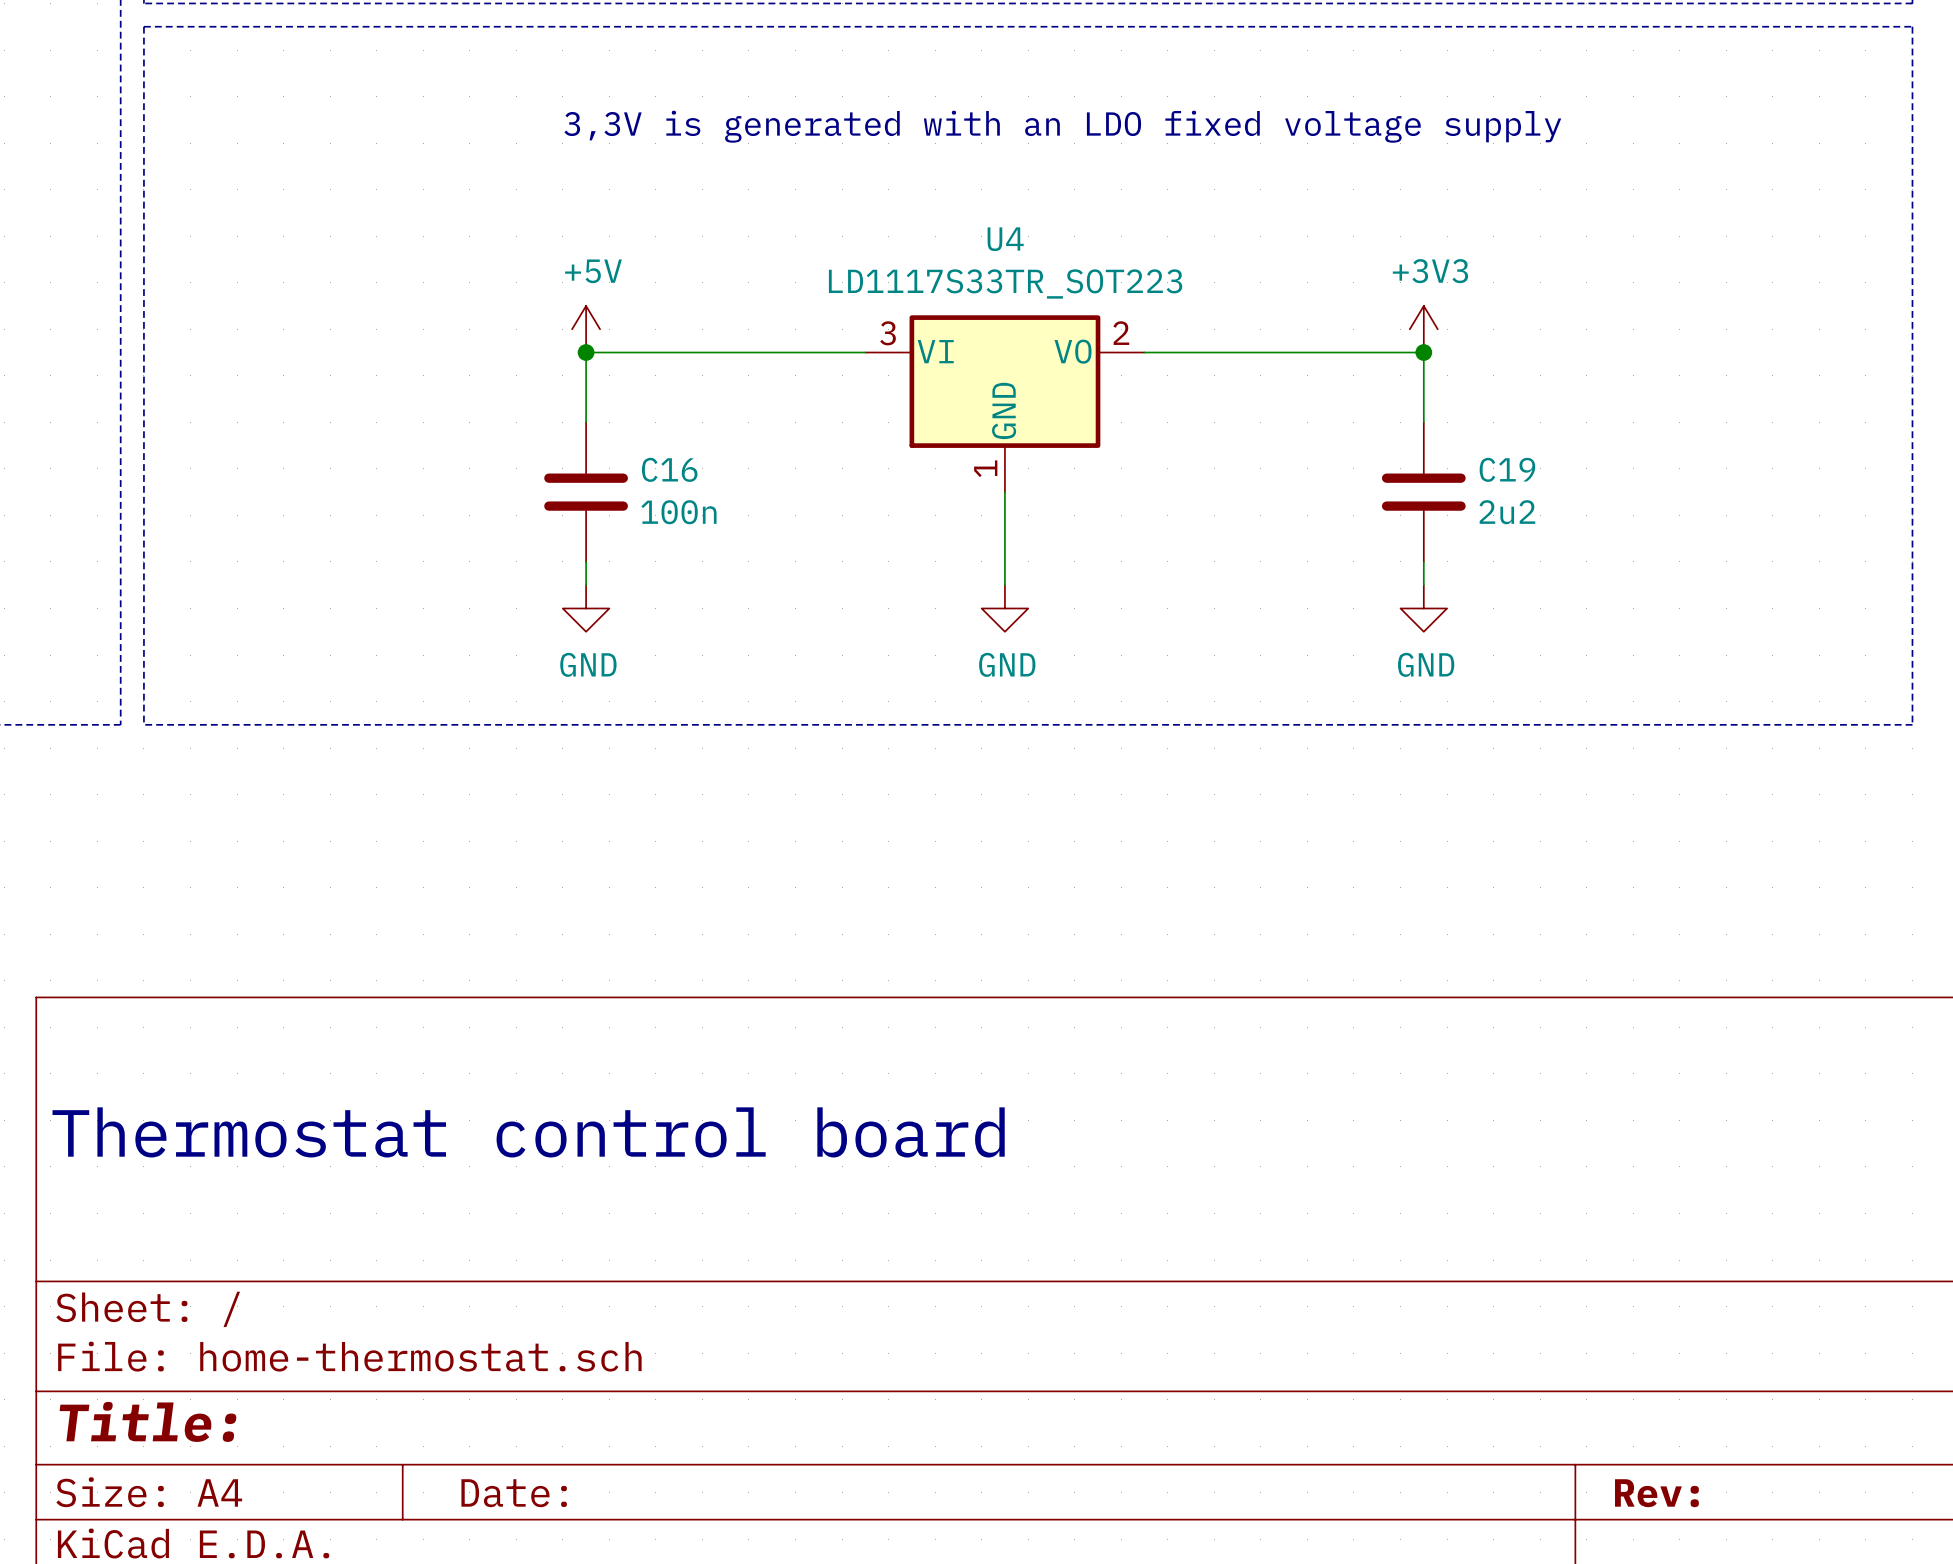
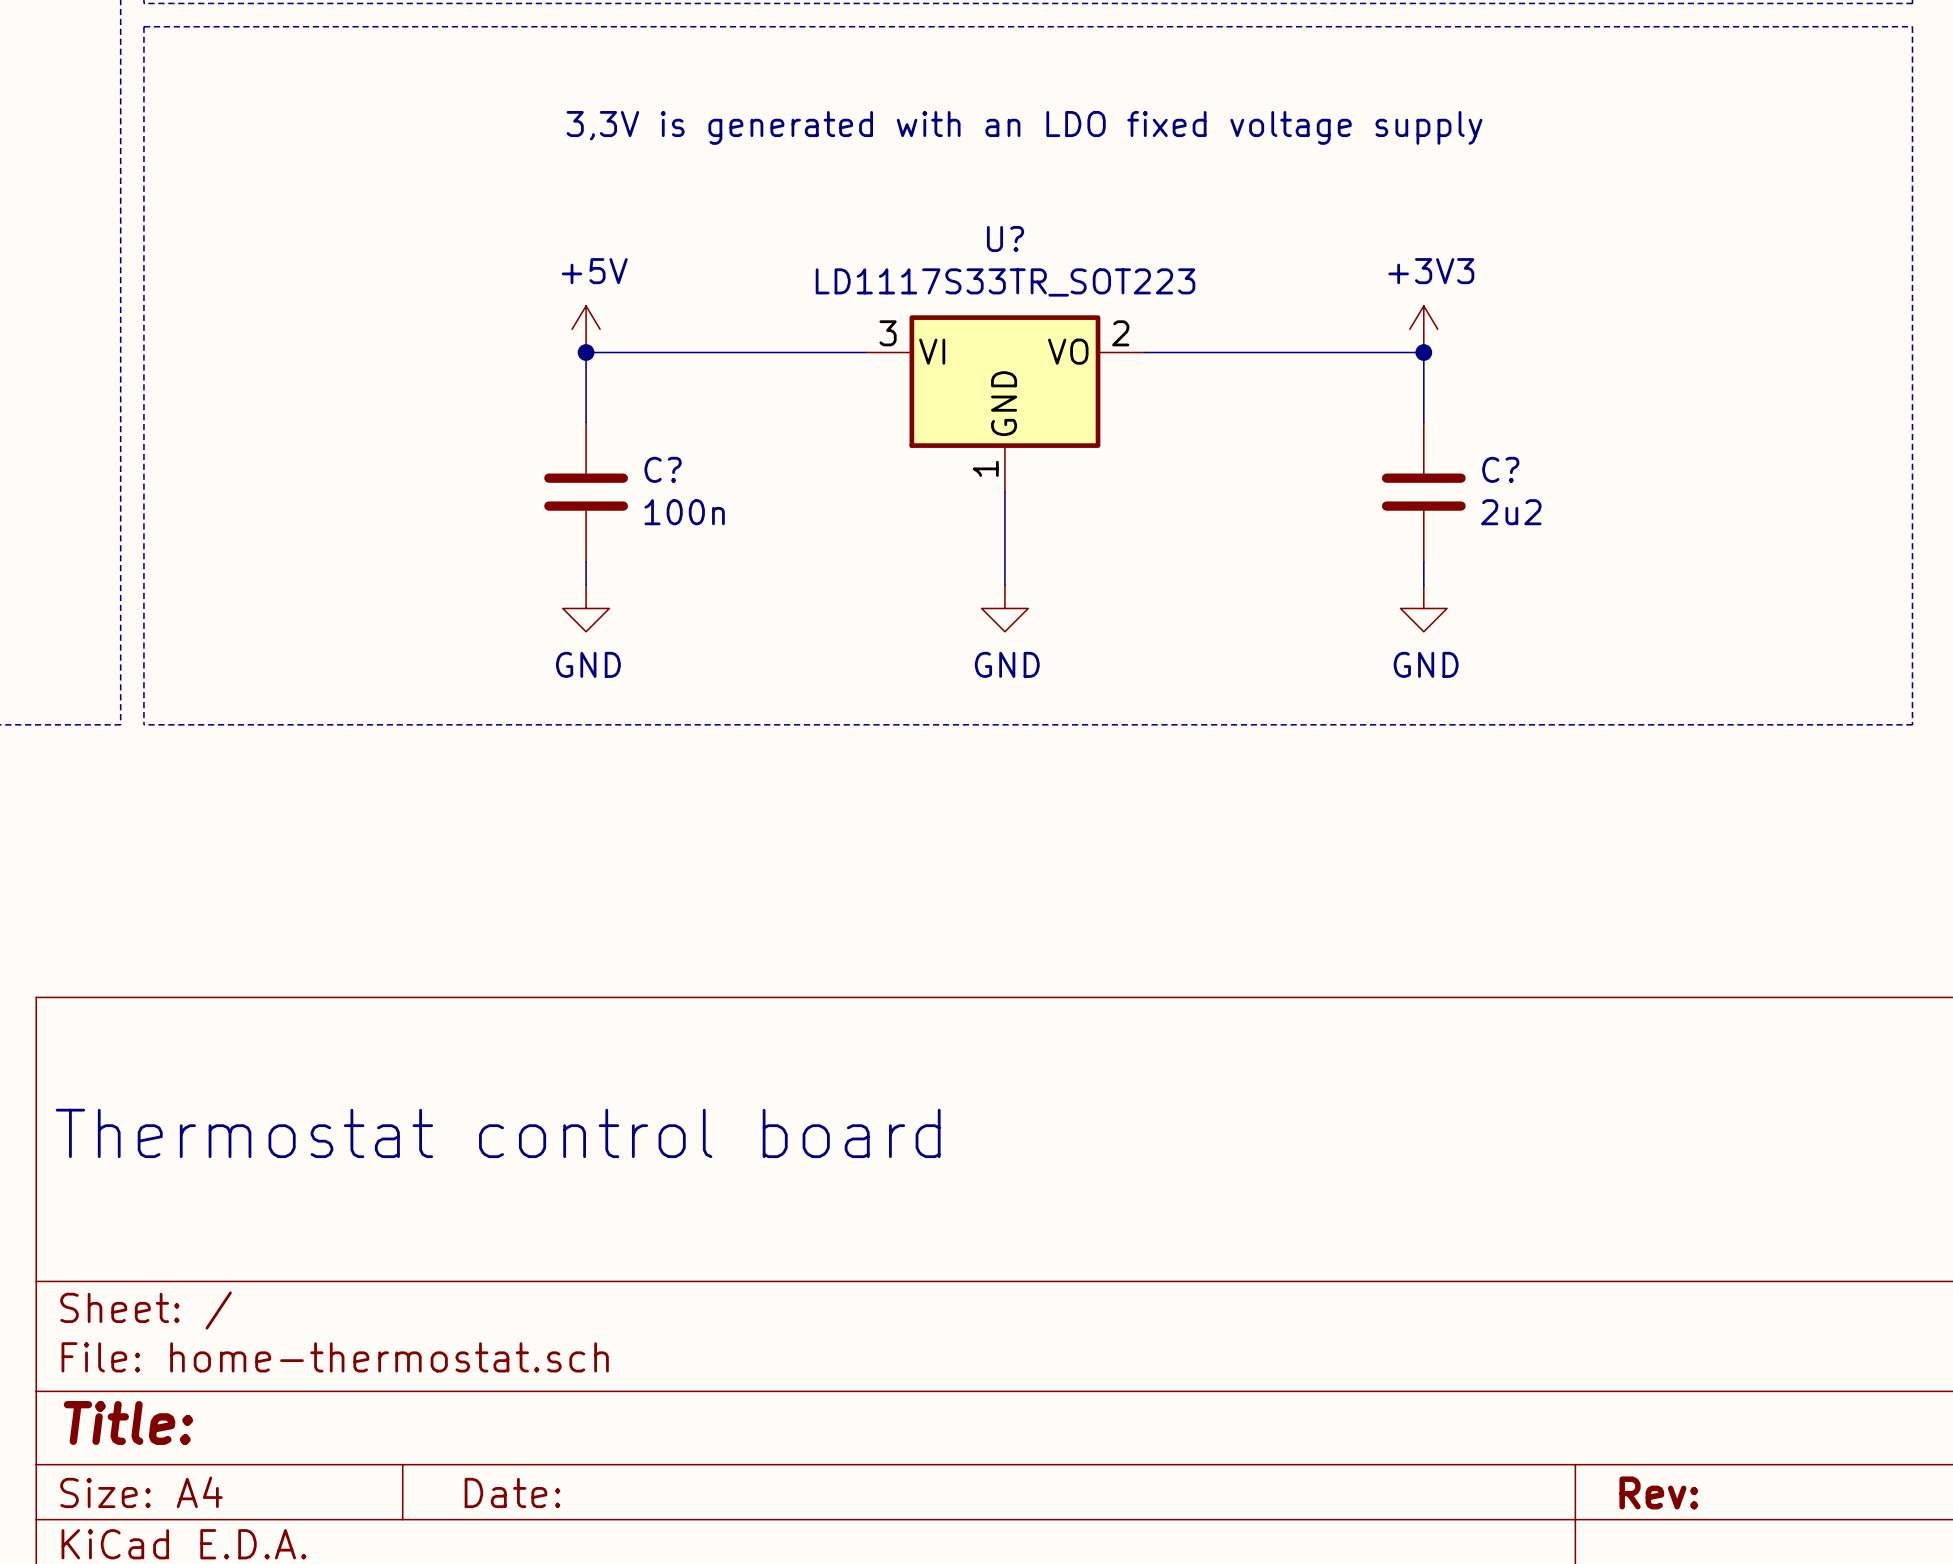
U4 name: U4 (1005, 239) -> U? (1005, 239)
C16 name: C16 (669, 469) -> C? (663, 469)
C19 name: C19 (1507, 469) -> C? (1500, 469)

